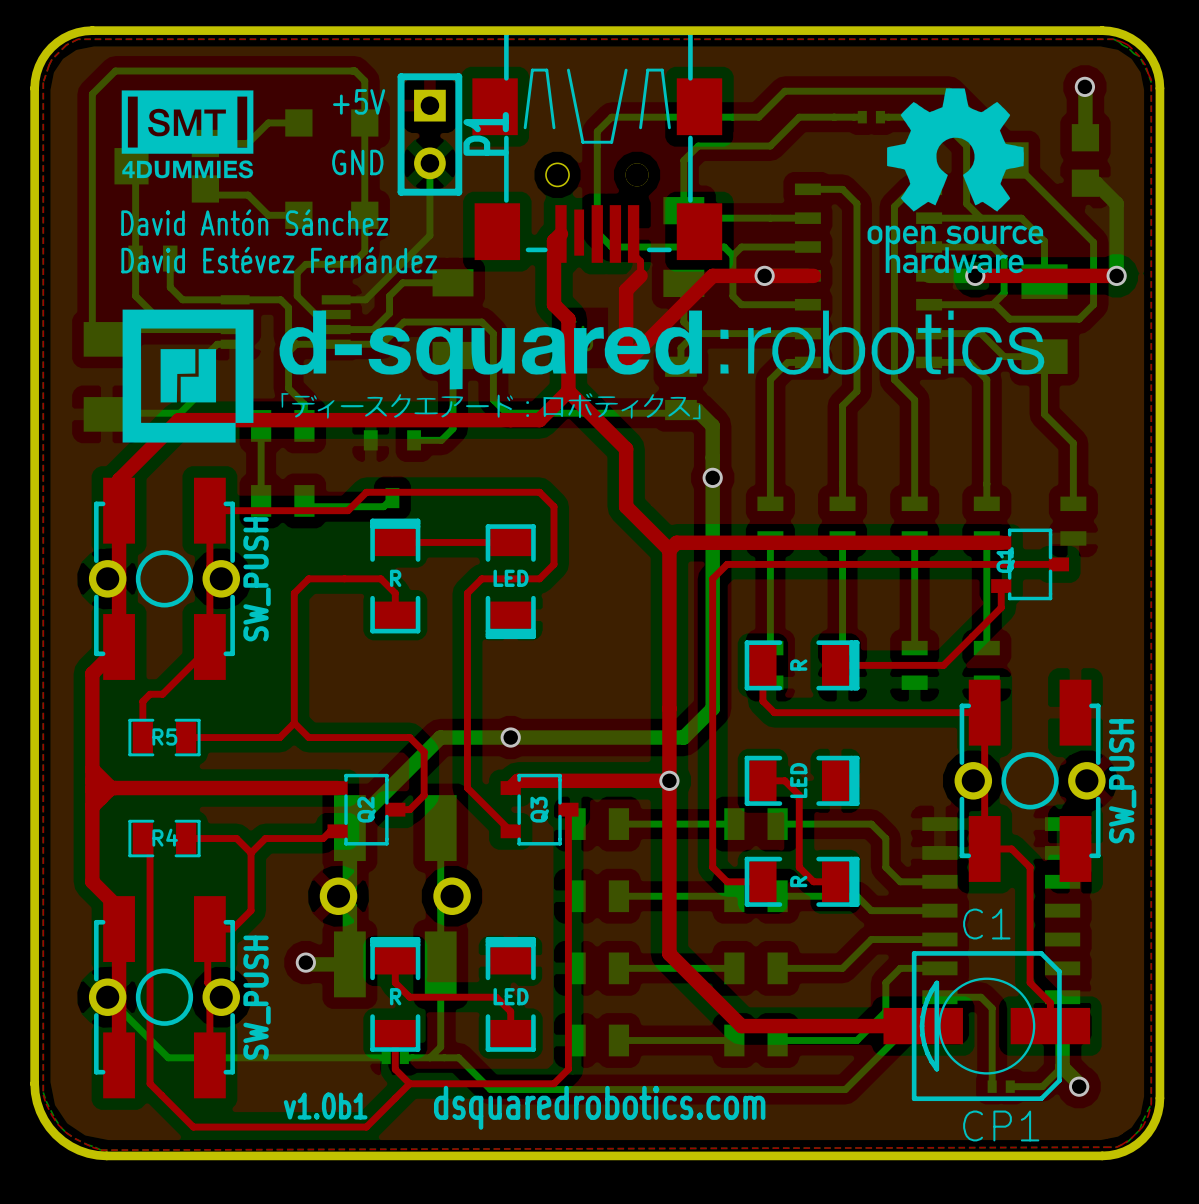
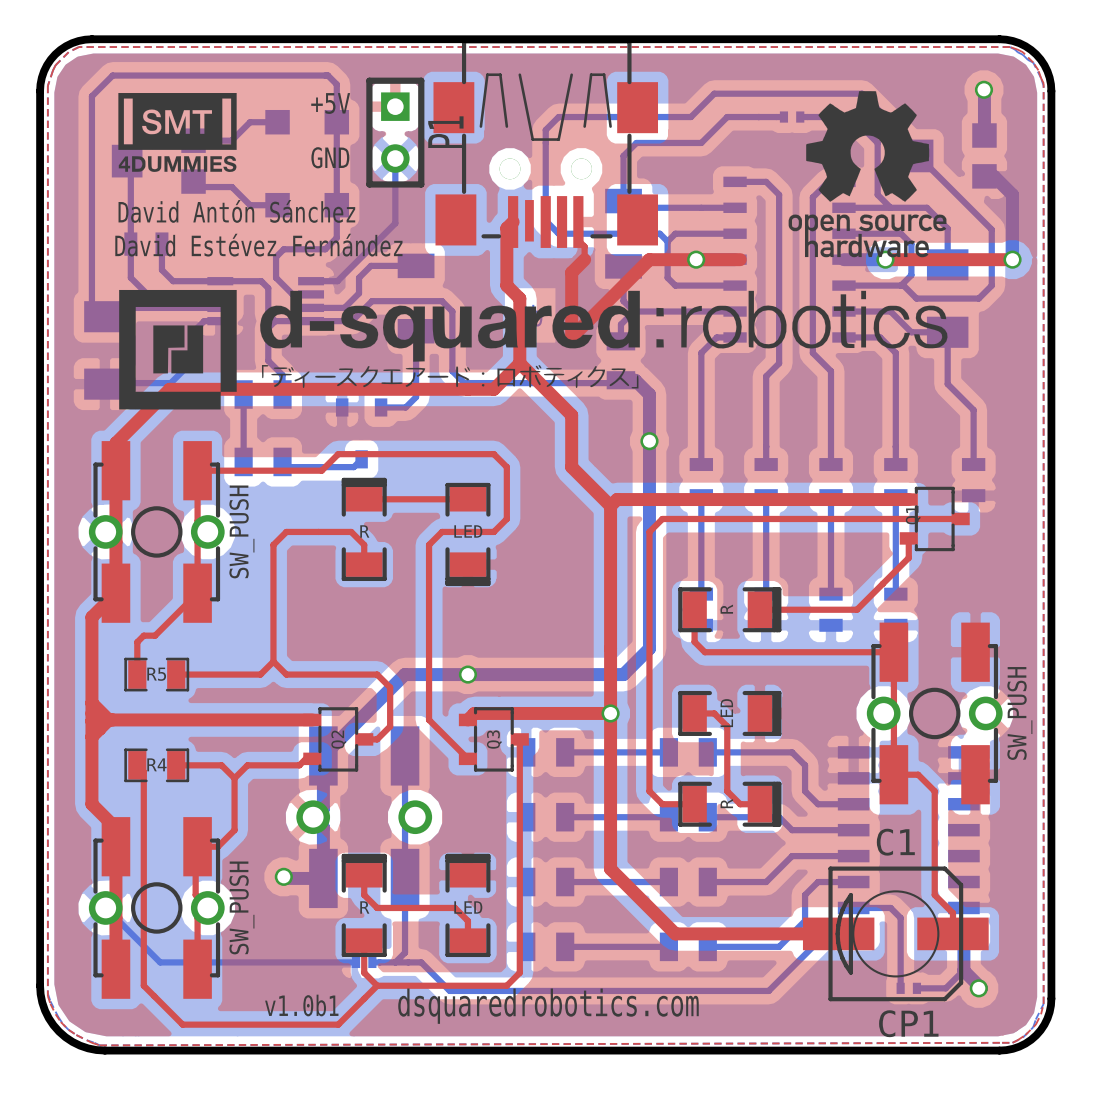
part footprint: [472, 30, 723, 263] -> [433, 39, 659, 248]

